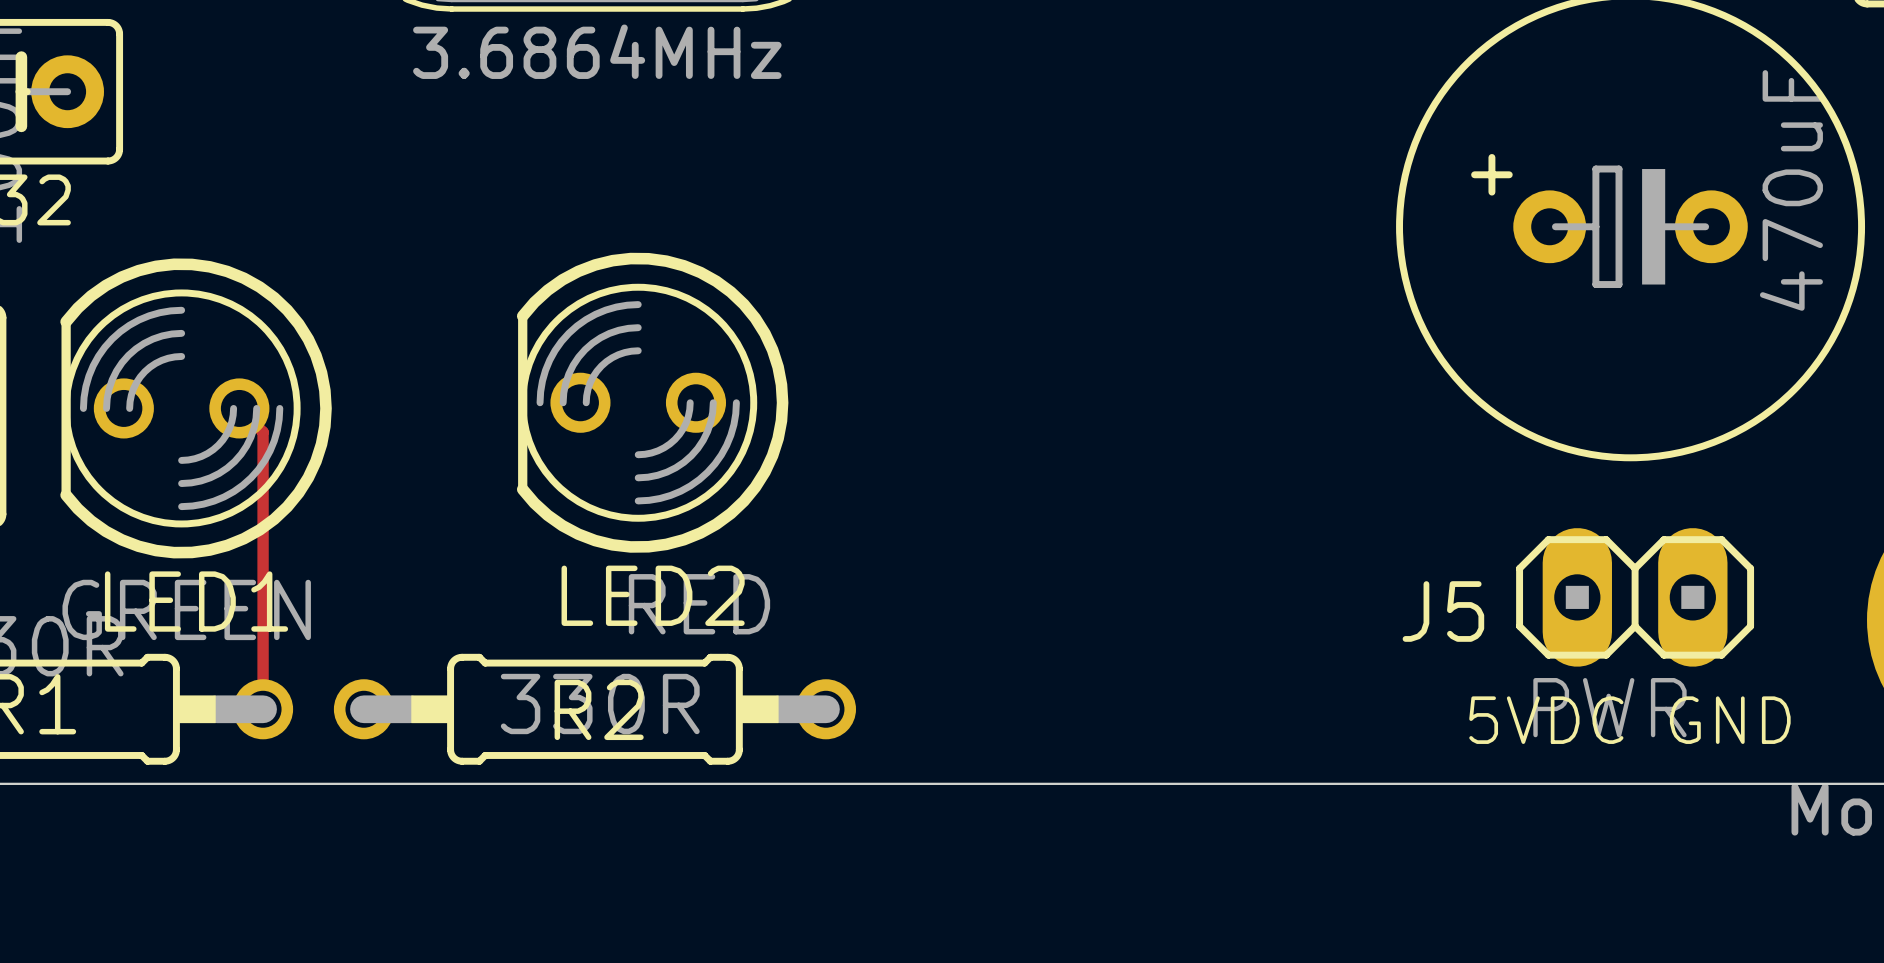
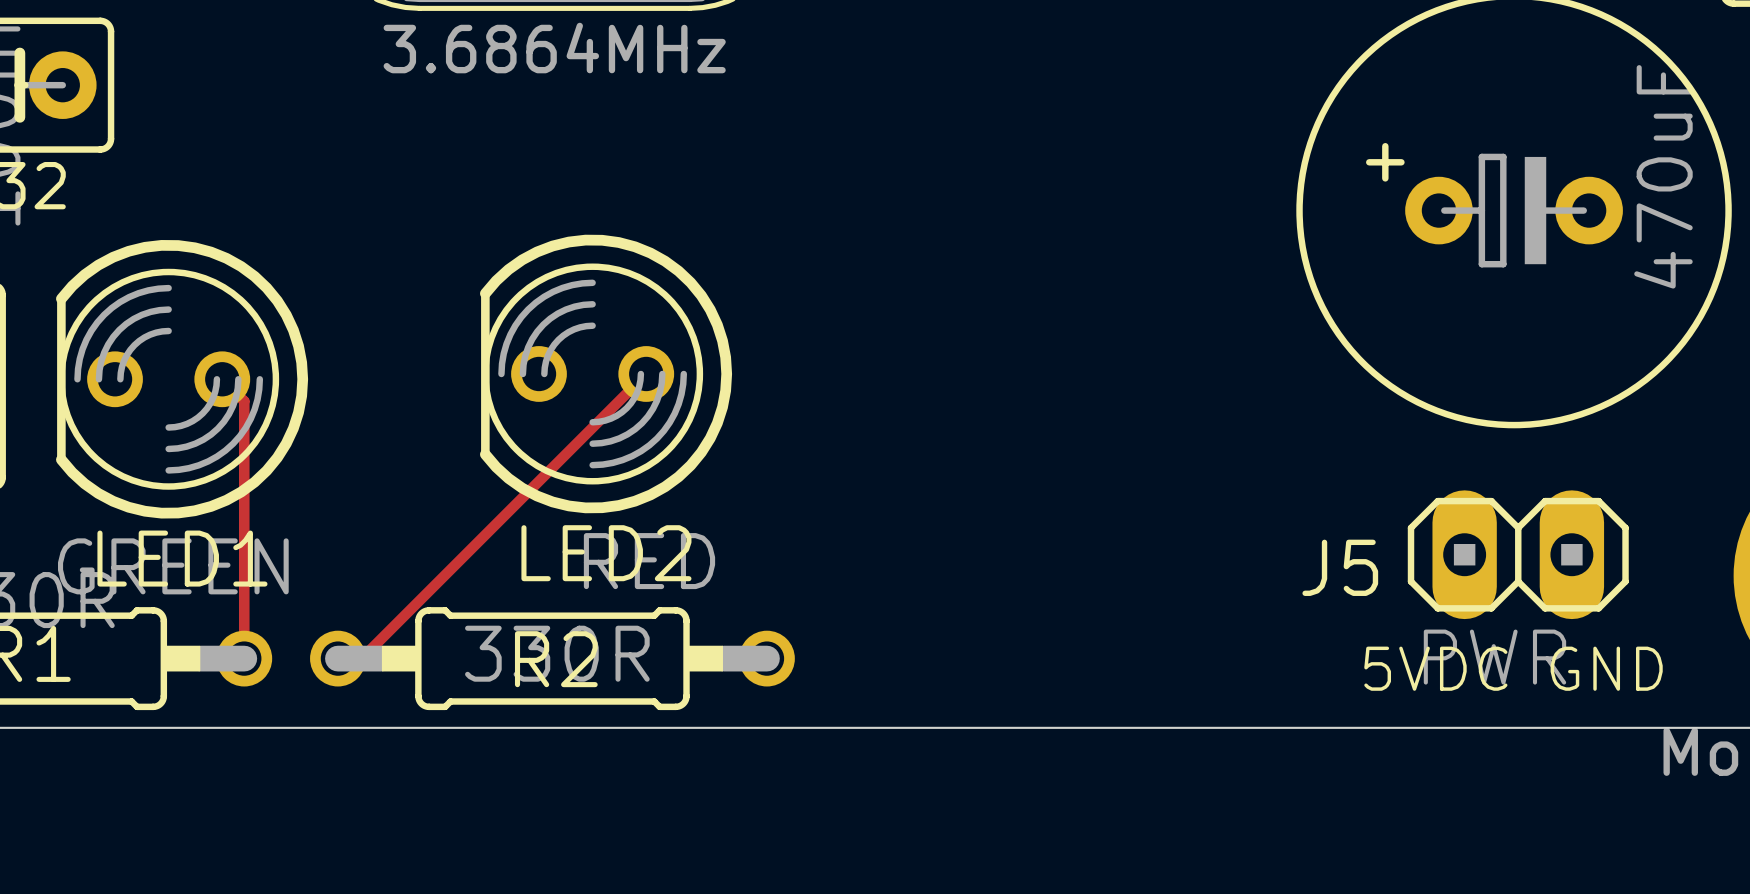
track: none -> (646, 373) (361, 658) (337, 658)

